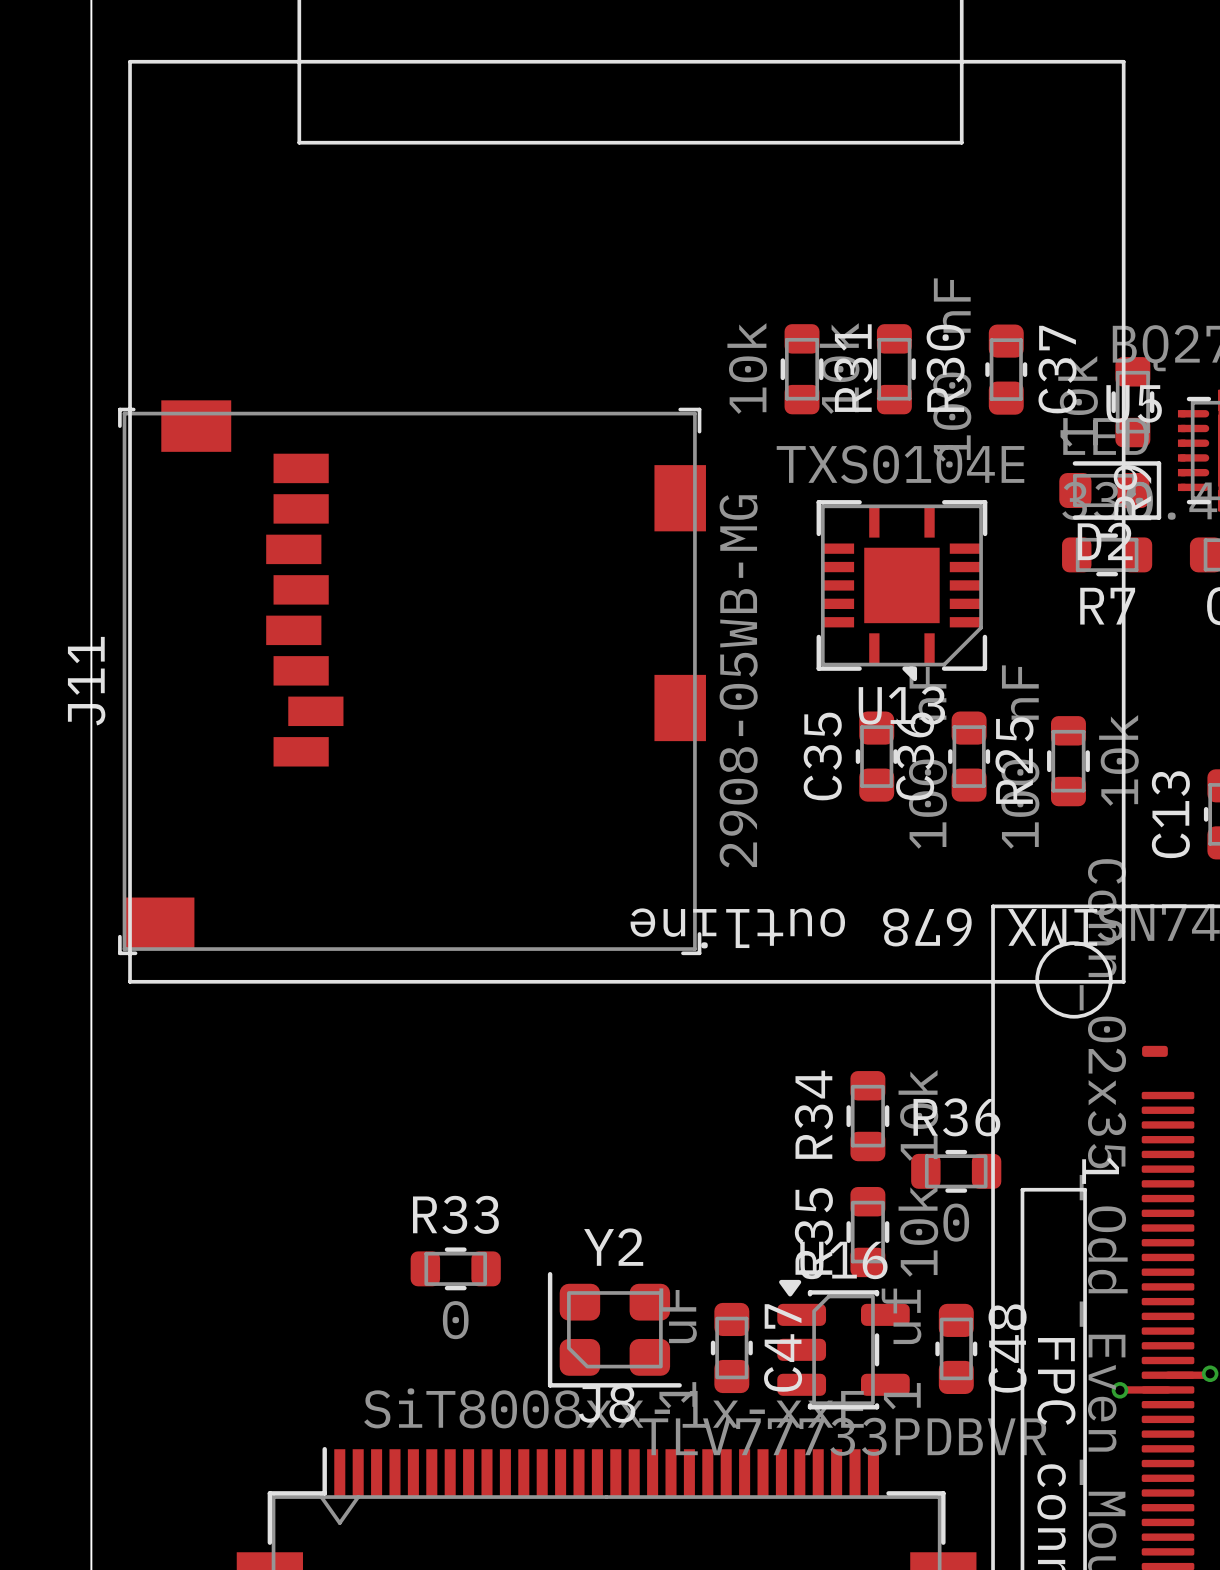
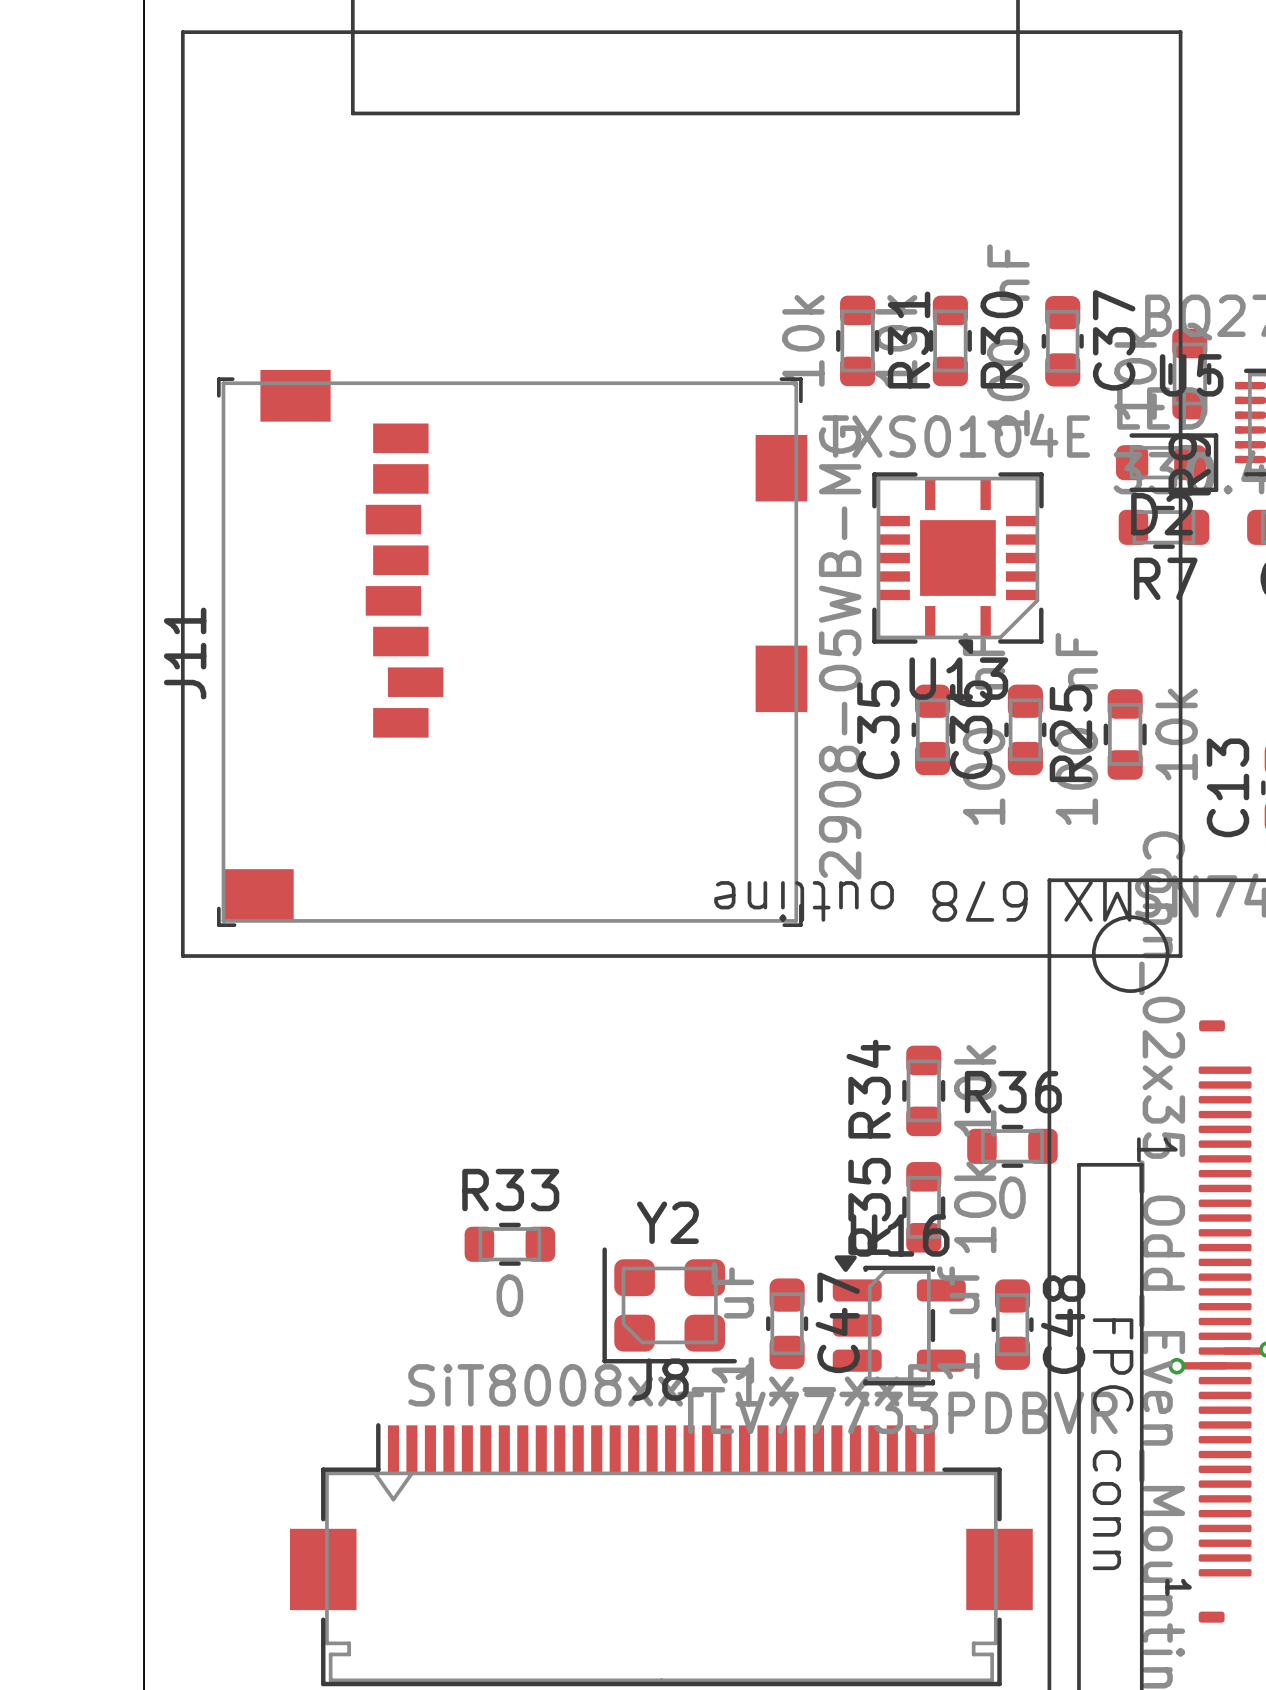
J11 position: (412, 677) -> (512, 648)

